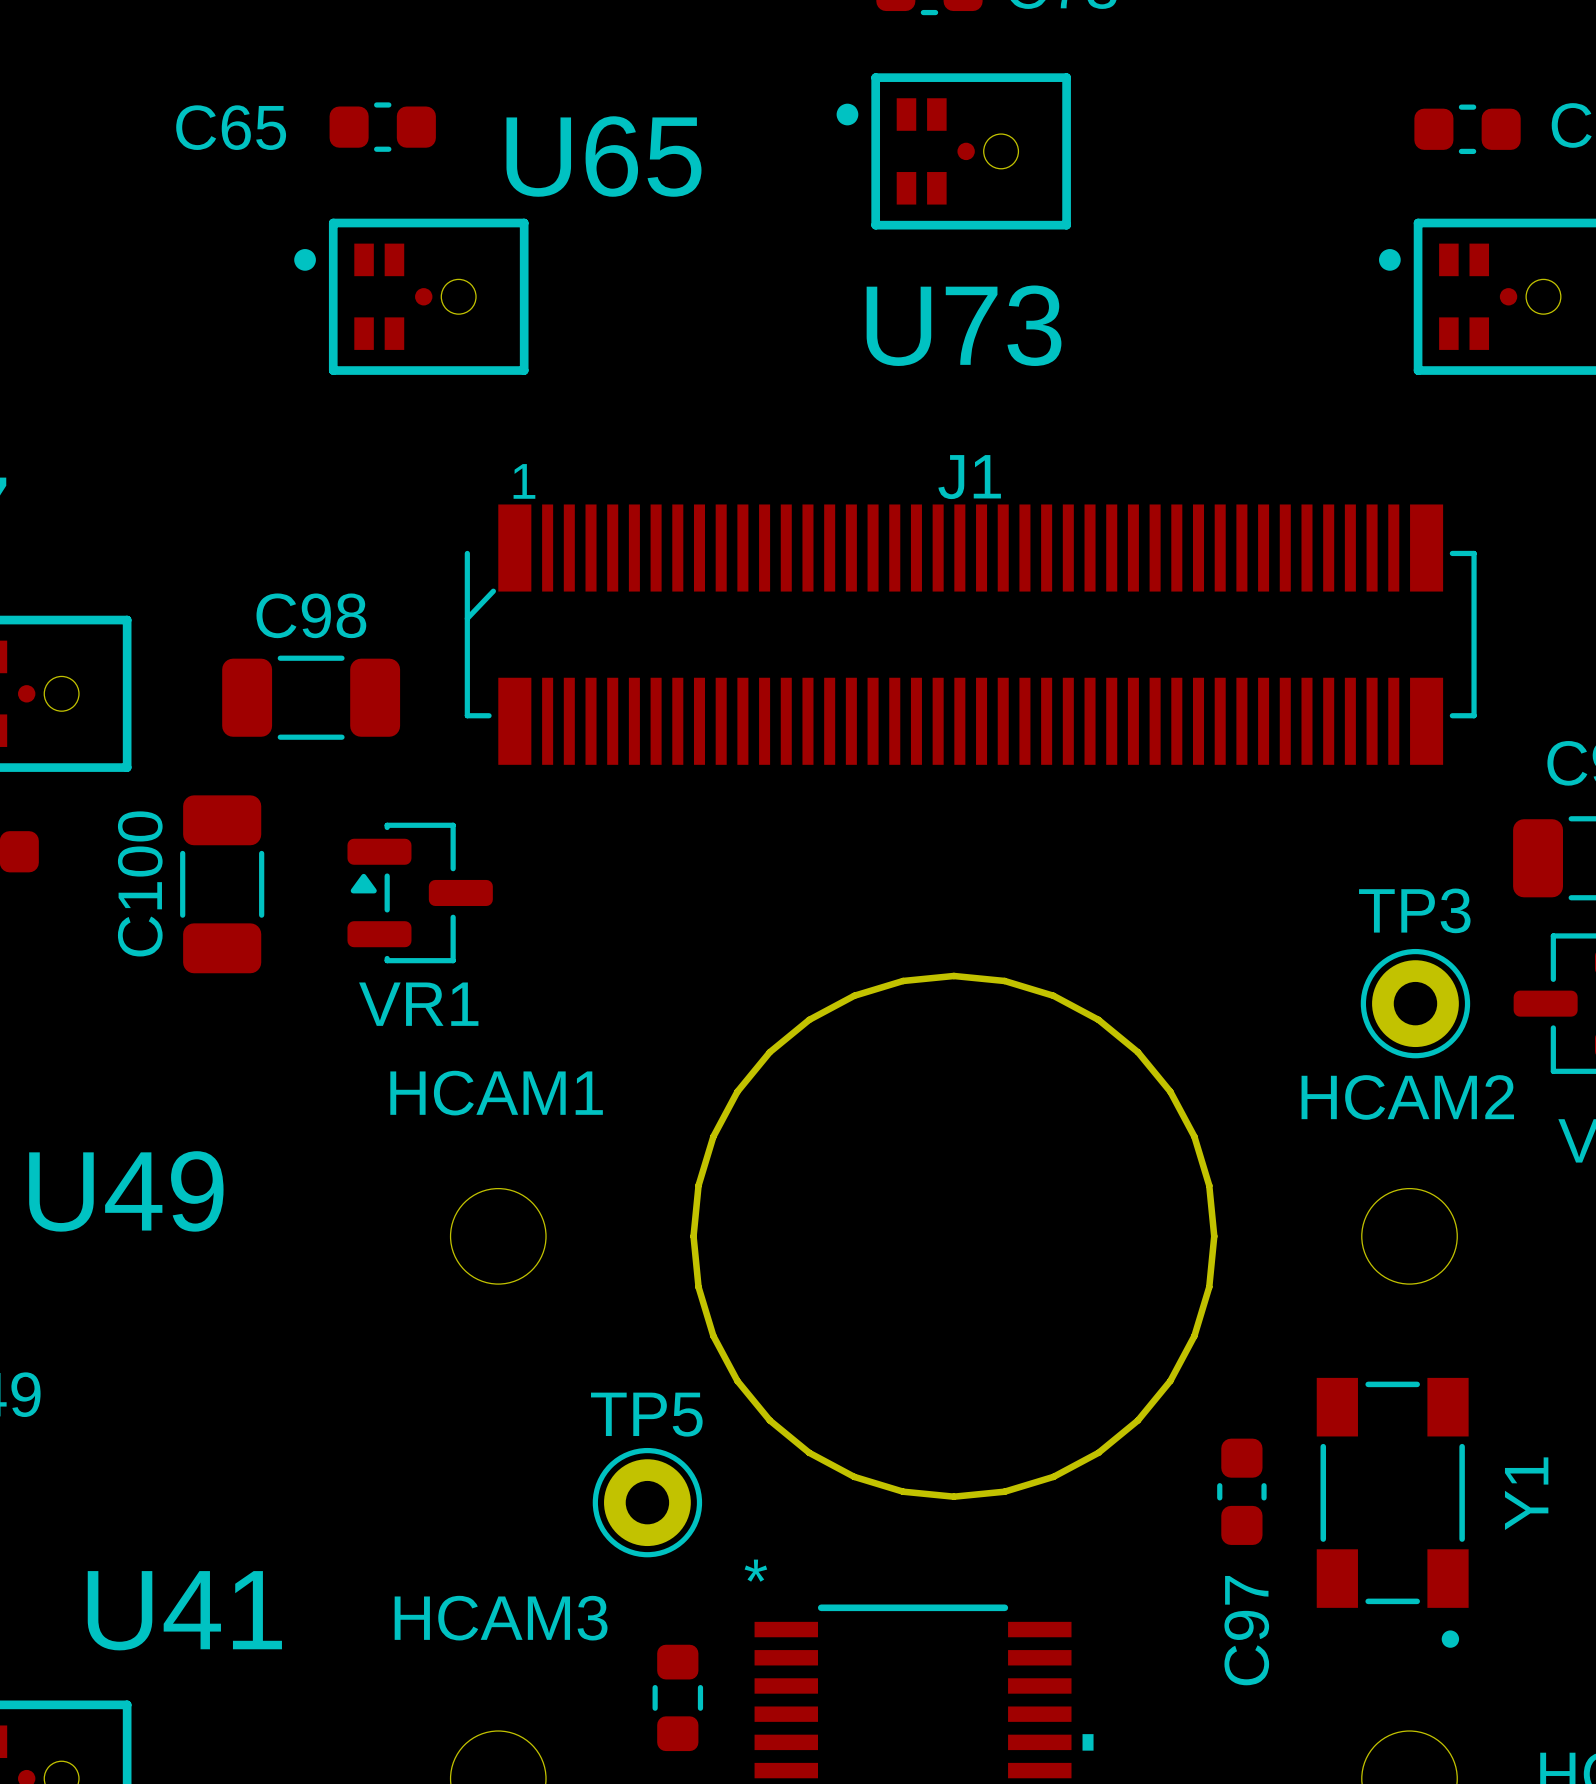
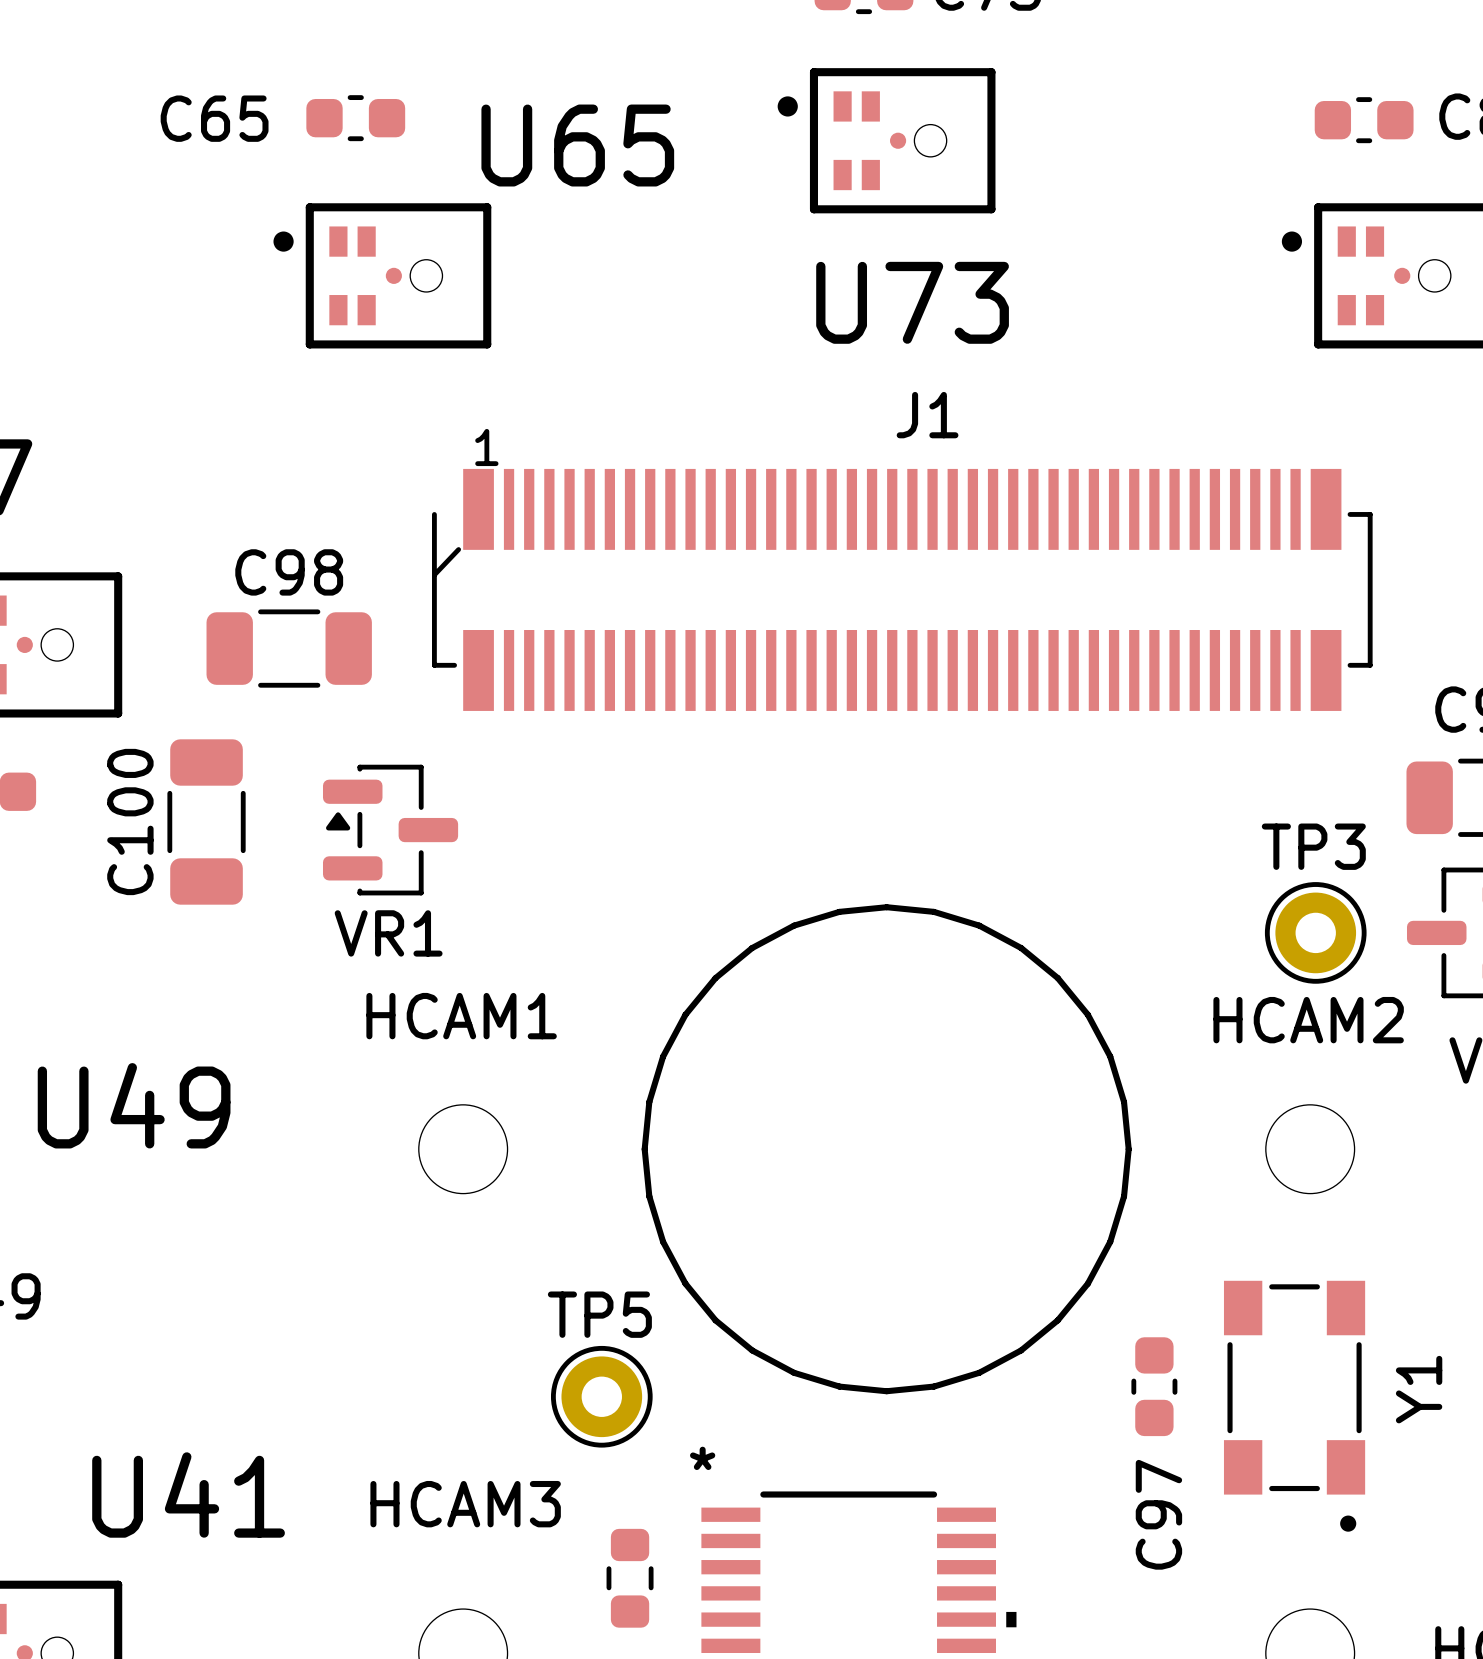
J1 name position: J1 (969, 477) -> J1 (927, 415)

